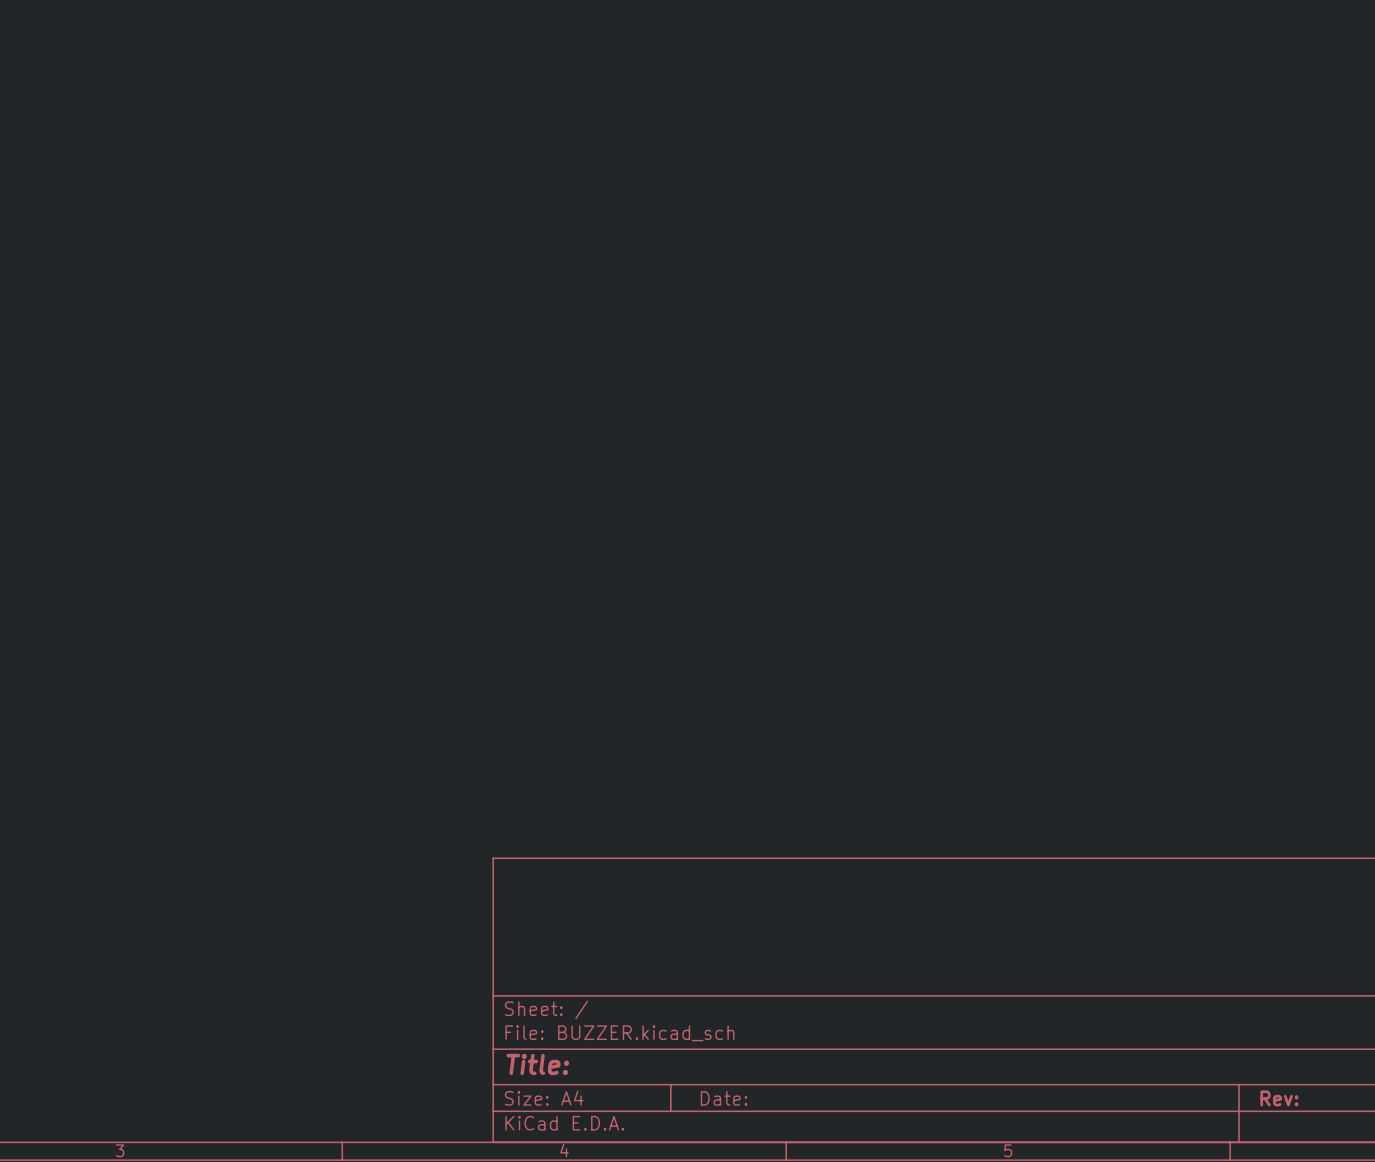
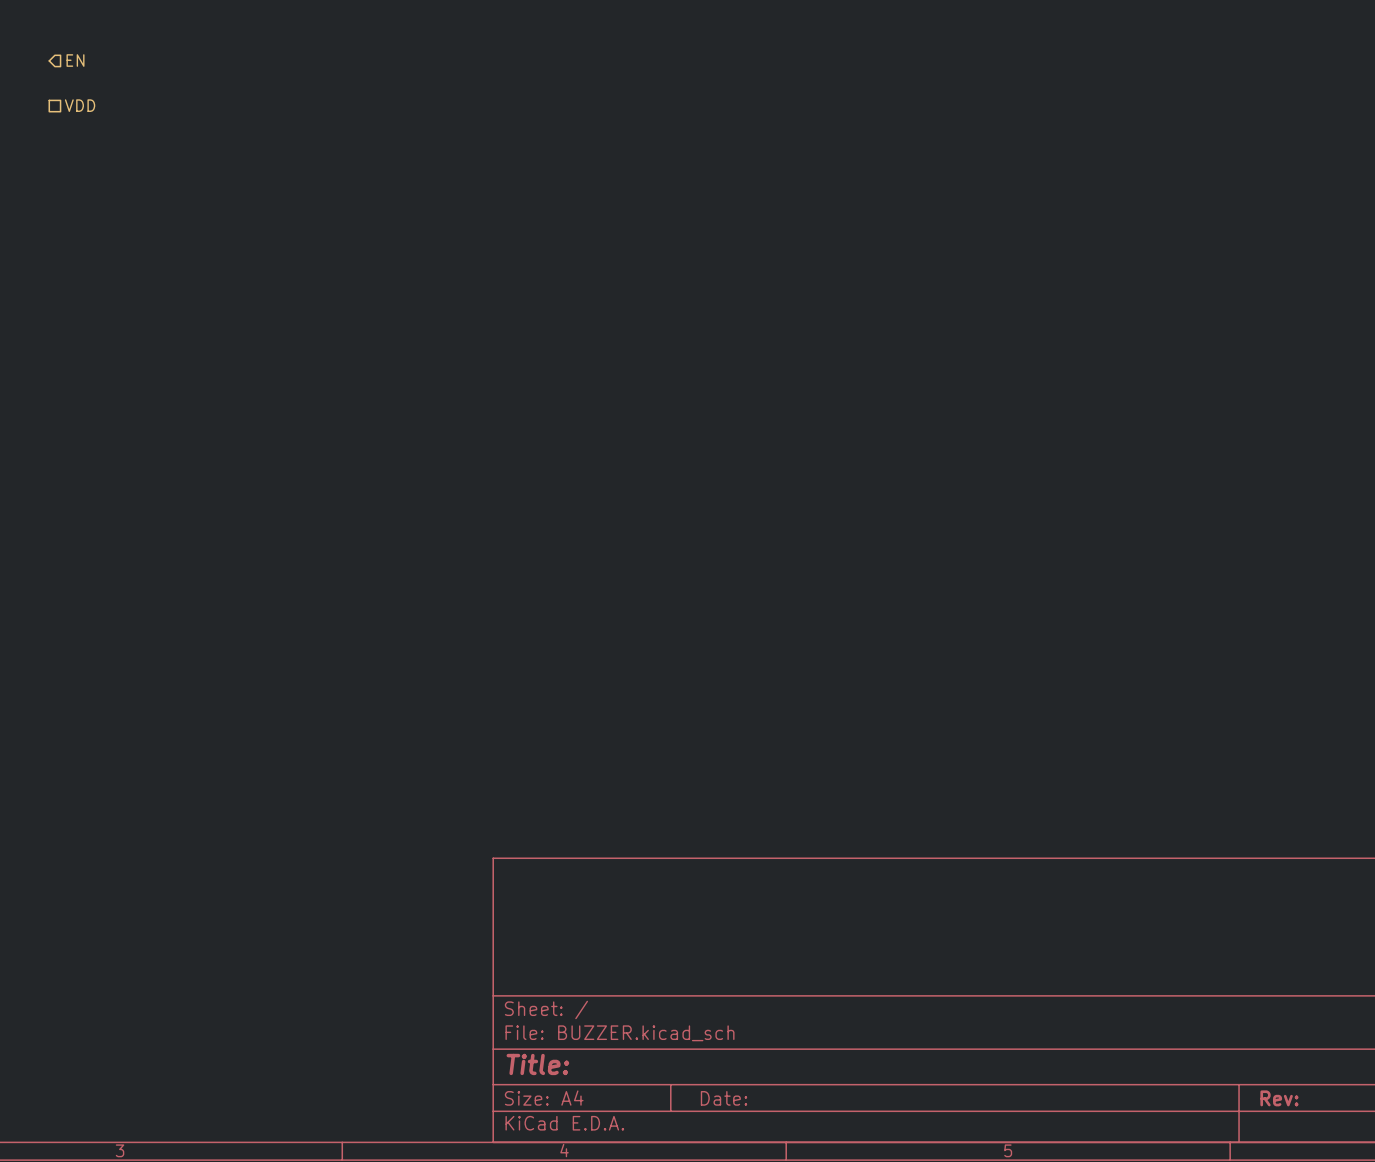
hierarchical label: none -> EN (75, 60)
hierarchical label: none -> VDD (80, 105)

